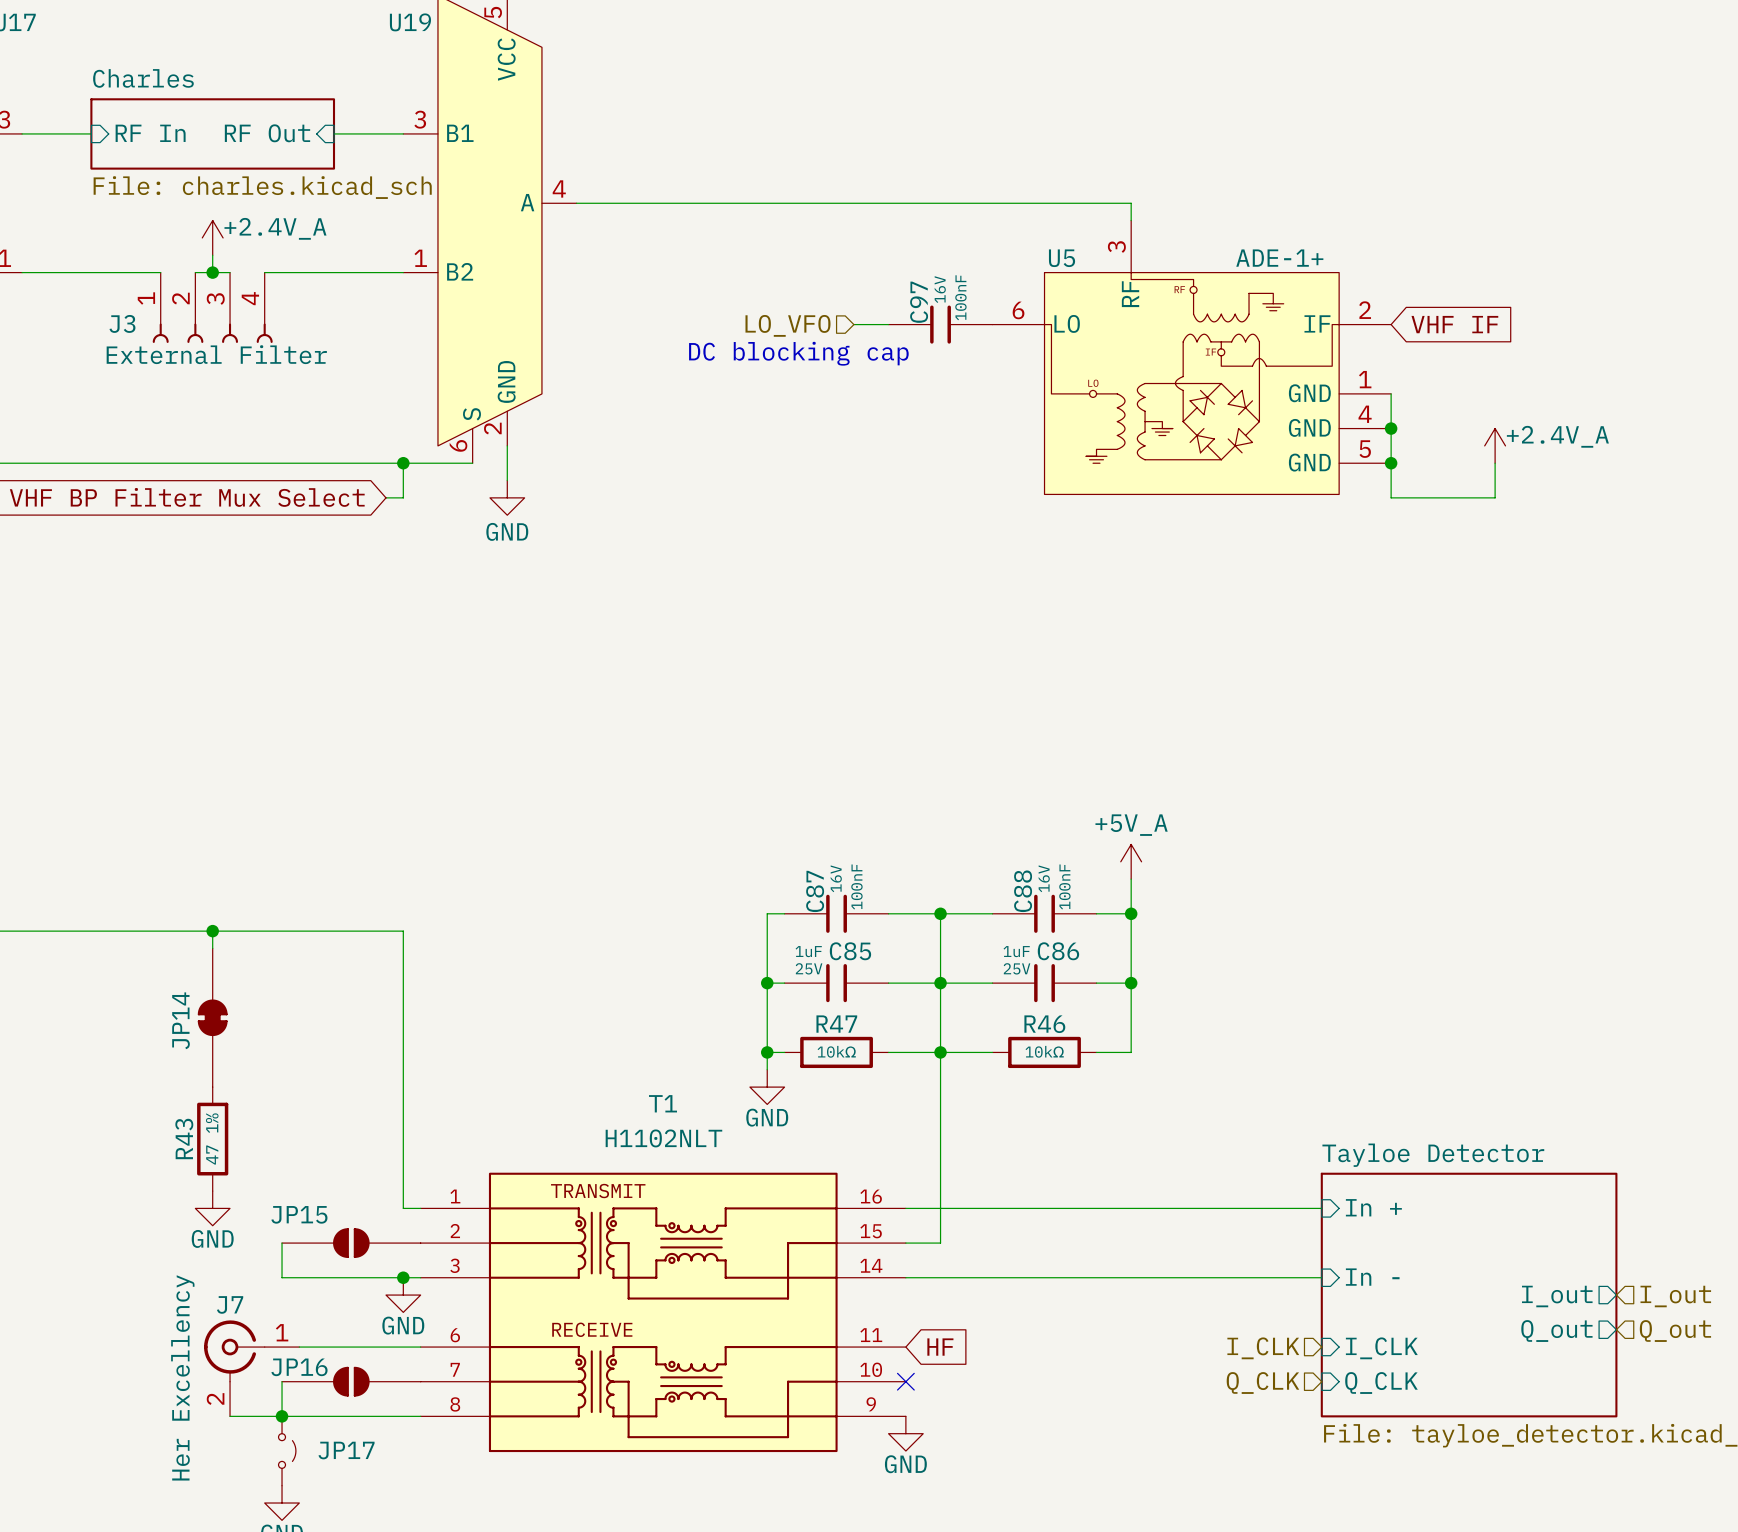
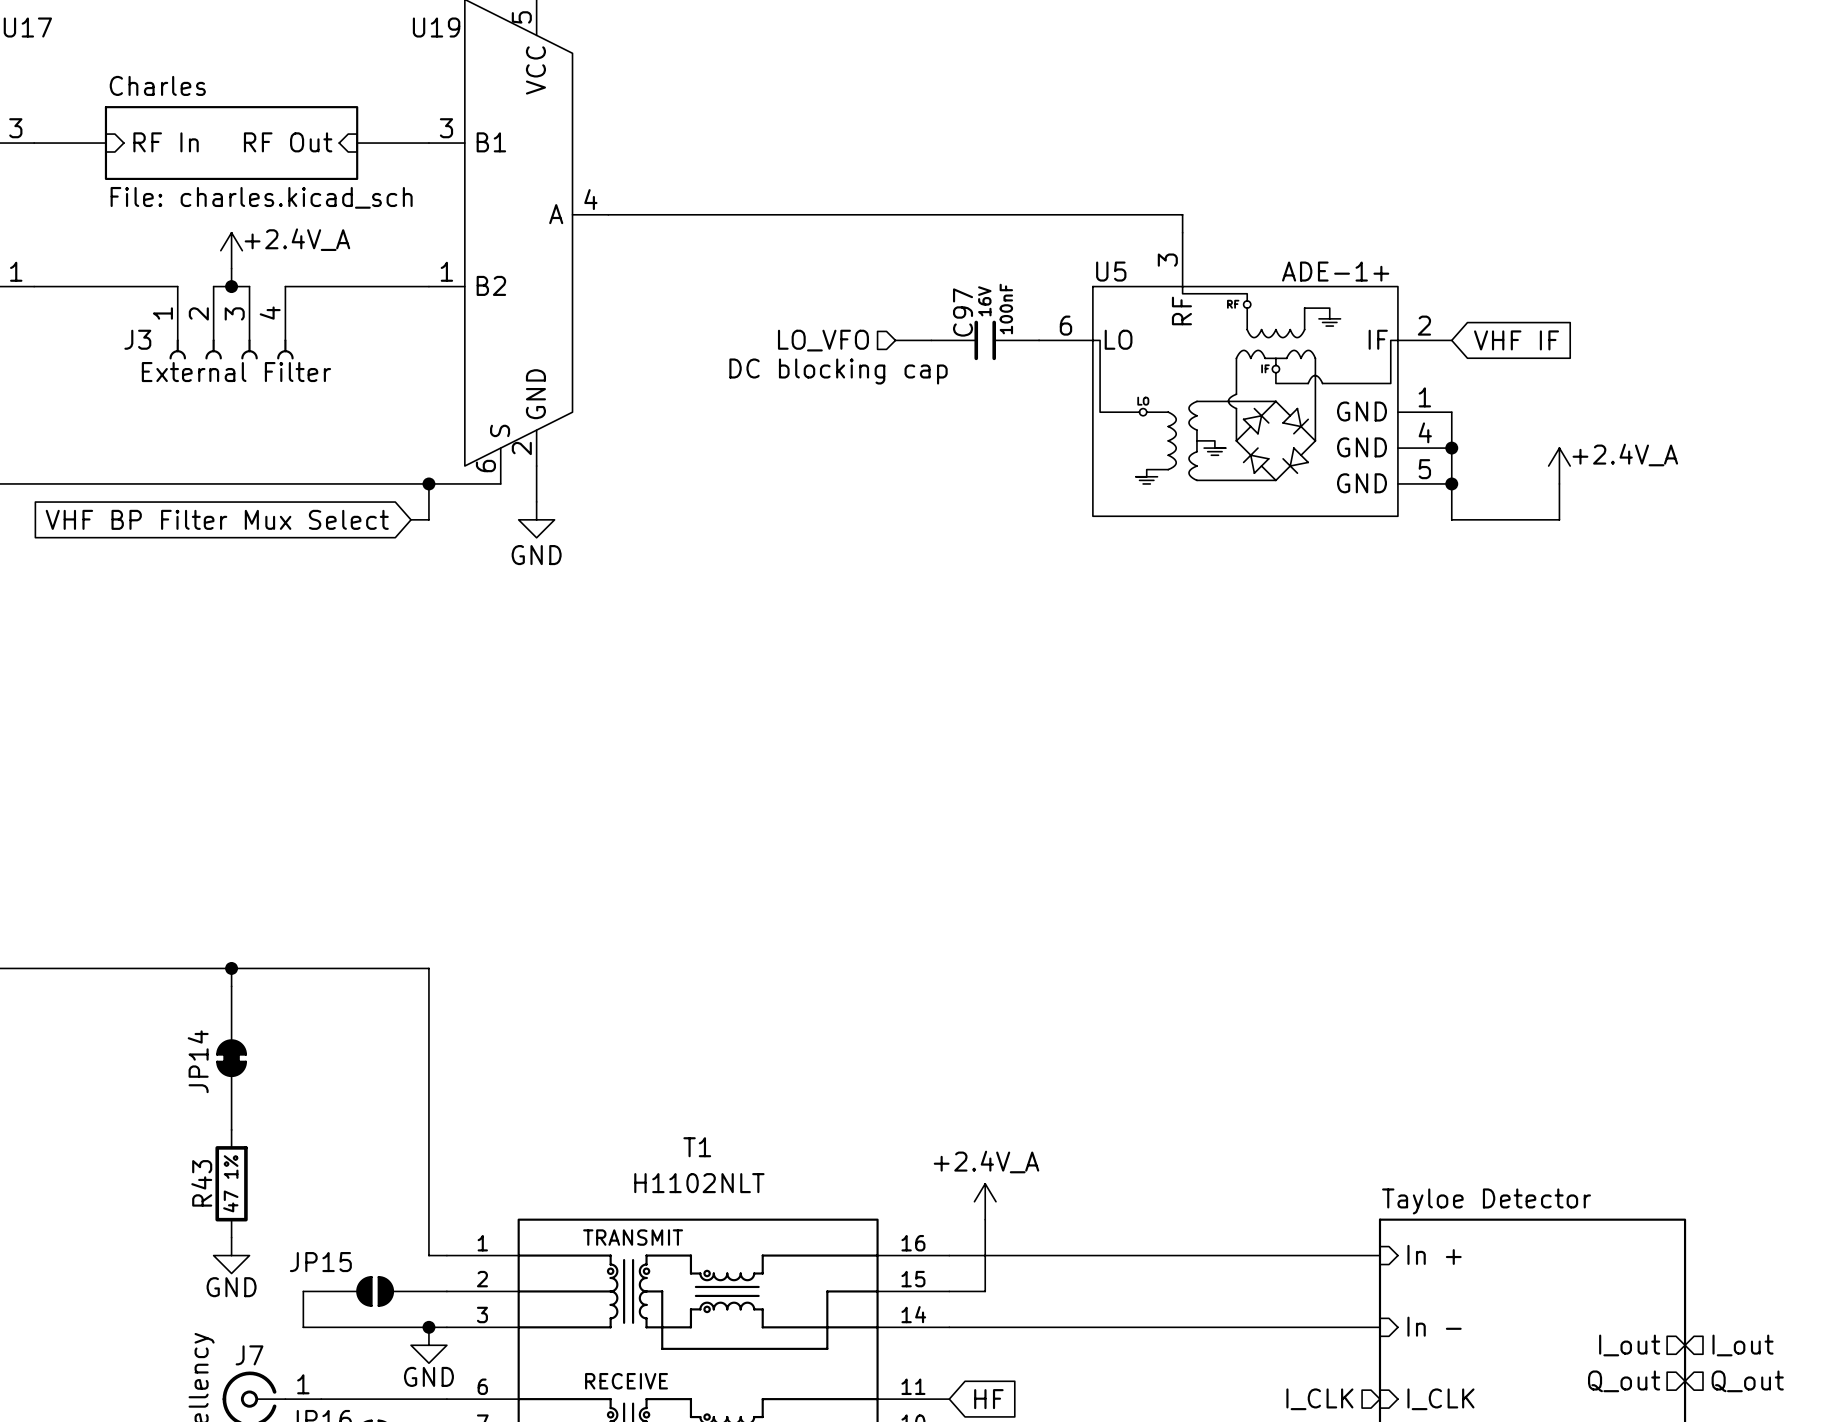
power symbol: +5V_A (1131, 861) -> none
wire: (1131, 879) (1131, 1052) (1096, 1052) -> none
wire: (784, 913) (767, 913) (767, 1069) -> none
C87: 100nF (836, 913) -> none
wire: (888, 913) (992, 913) -> none
wire: (940, 913) (940, 1173) -> none
junction: (940, 913) -> none
C88: 100nF (1044, 913) -> none
wire: (1096, 913) (1131, 913) -> none
junction: (1131, 913) -> none
wire: (767, 983) (784, 983) -> none
junction: (767, 983) -> none
C85: 1uF (836, 983) -> none
wire: (888, 983) (992, 983) -> none
junction: (940, 983) -> none
C86: 1uF (1044, 983) -> none
wire: (1096, 983) (1131, 983) -> none
junction: (1131, 983) -> none
wire: (767, 1052) (784, 1052) -> none
junction: (767, 1052) -> none
R47: 10kΩ (836, 1052) -> none
wire: (888, 1052) (992, 1052) -> none
junction: (940, 1052) -> none
R46: 10kΩ (1044, 1052) -> none
power symbol: GND (767, 1087) -> none
power symbol: none -> +2.4V_A (985, 1201)

